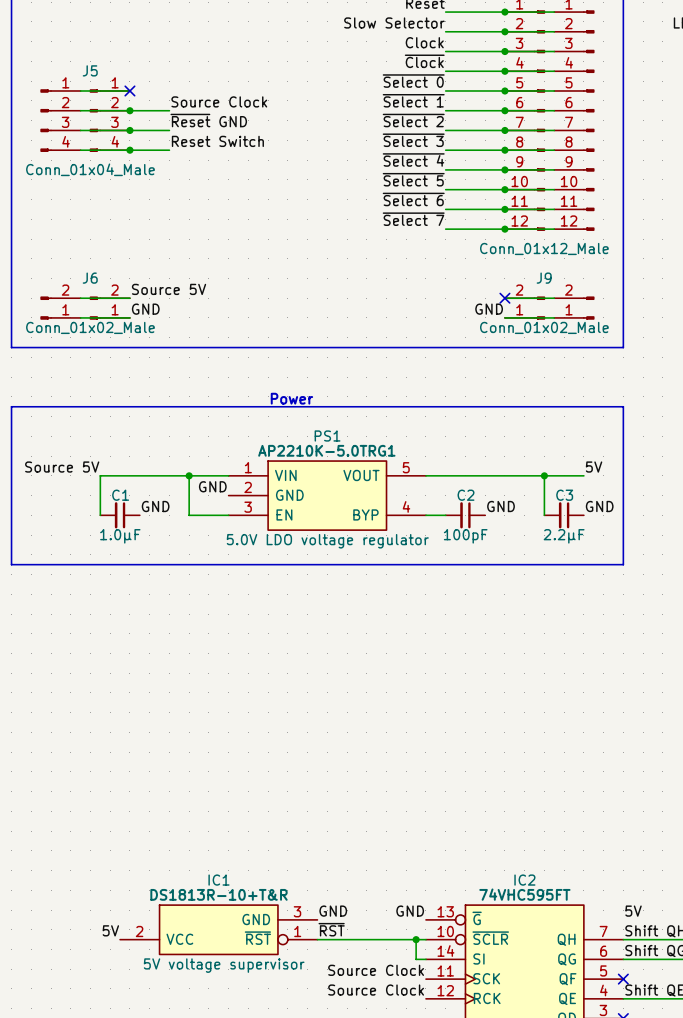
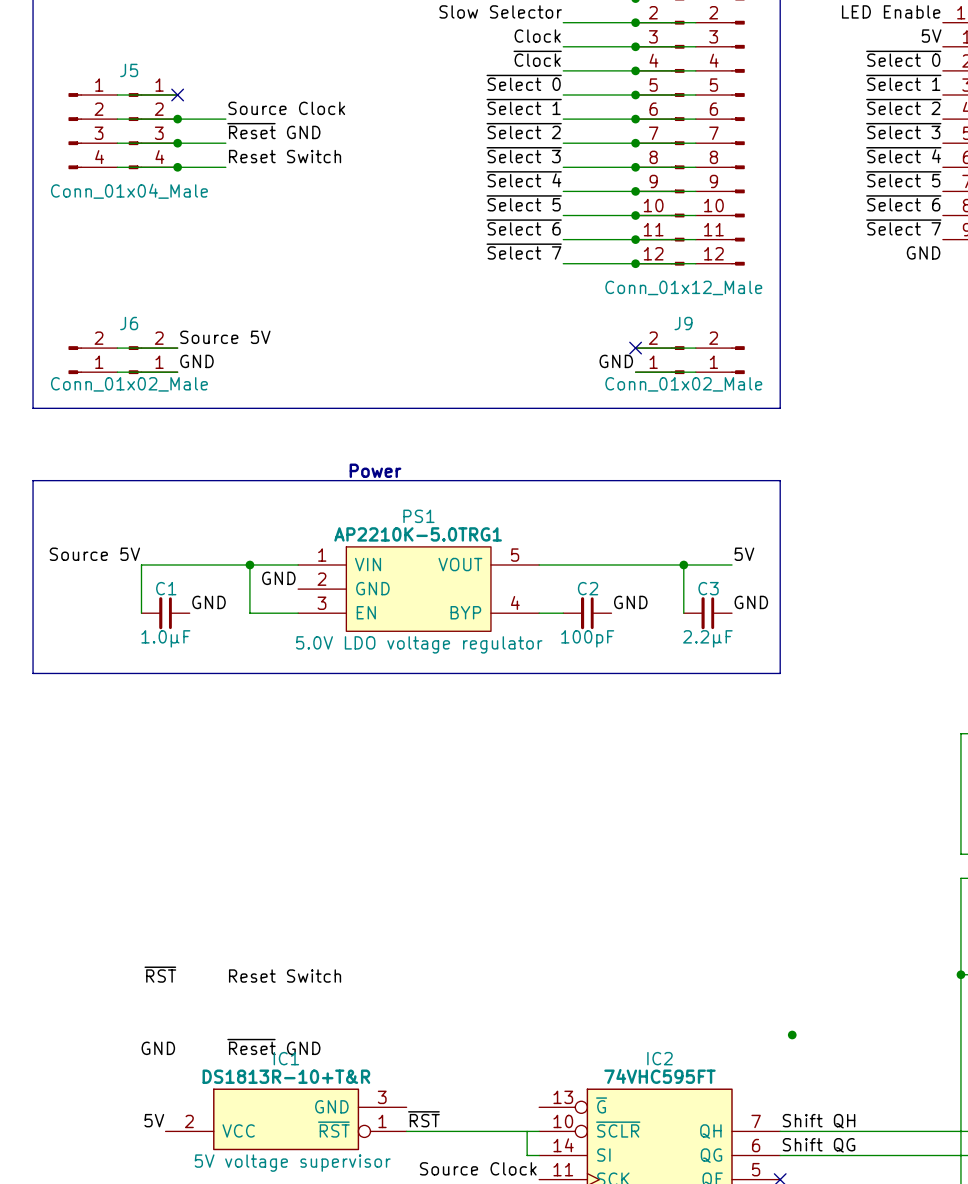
label: none -> ~{RST} (160, 974)
label: none -> Reset Switch (285, 976)
junction: none -> (792, 1034)
label: none -> ~{Reset} GND (273, 1046)
label: none -> GND (158, 1048)
label: GND (333, 911) -> none
label: GND (410, 911) -> none
label: 5V (633, 911) -> none
junction: (416, 939) -> none

